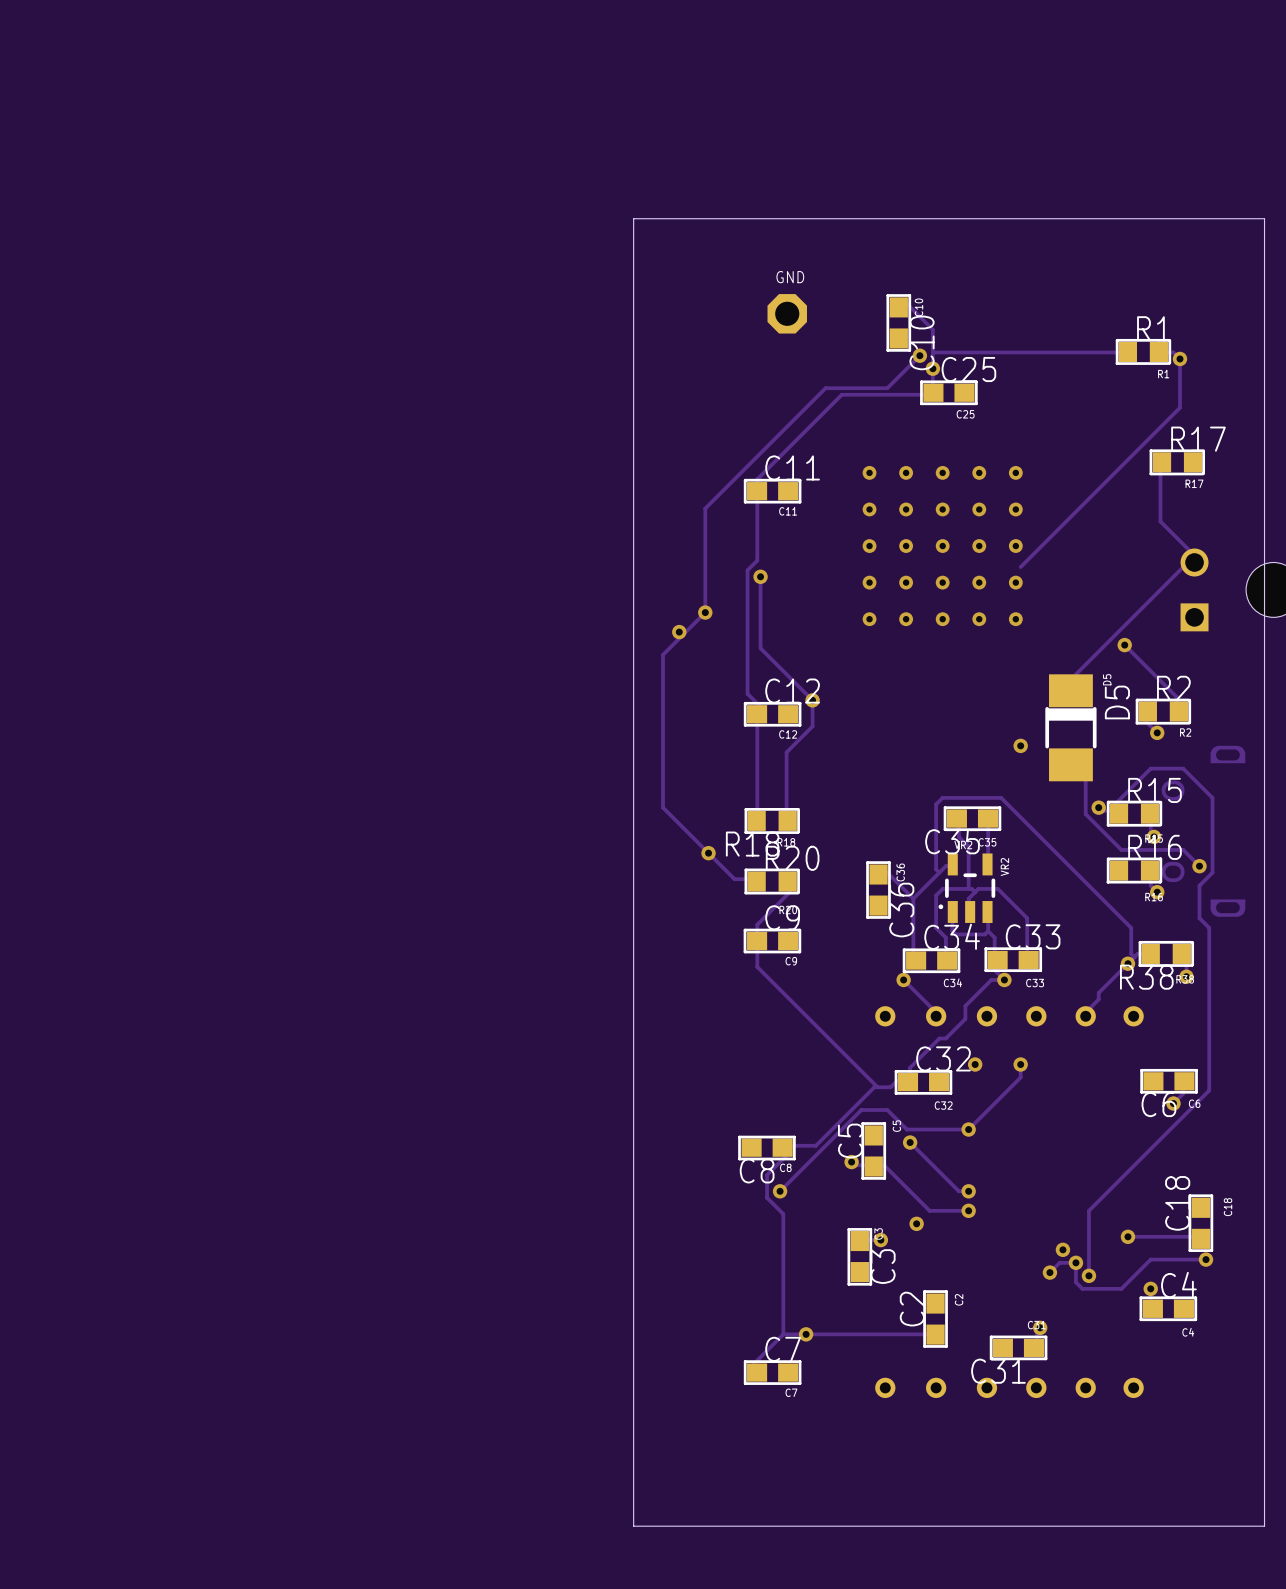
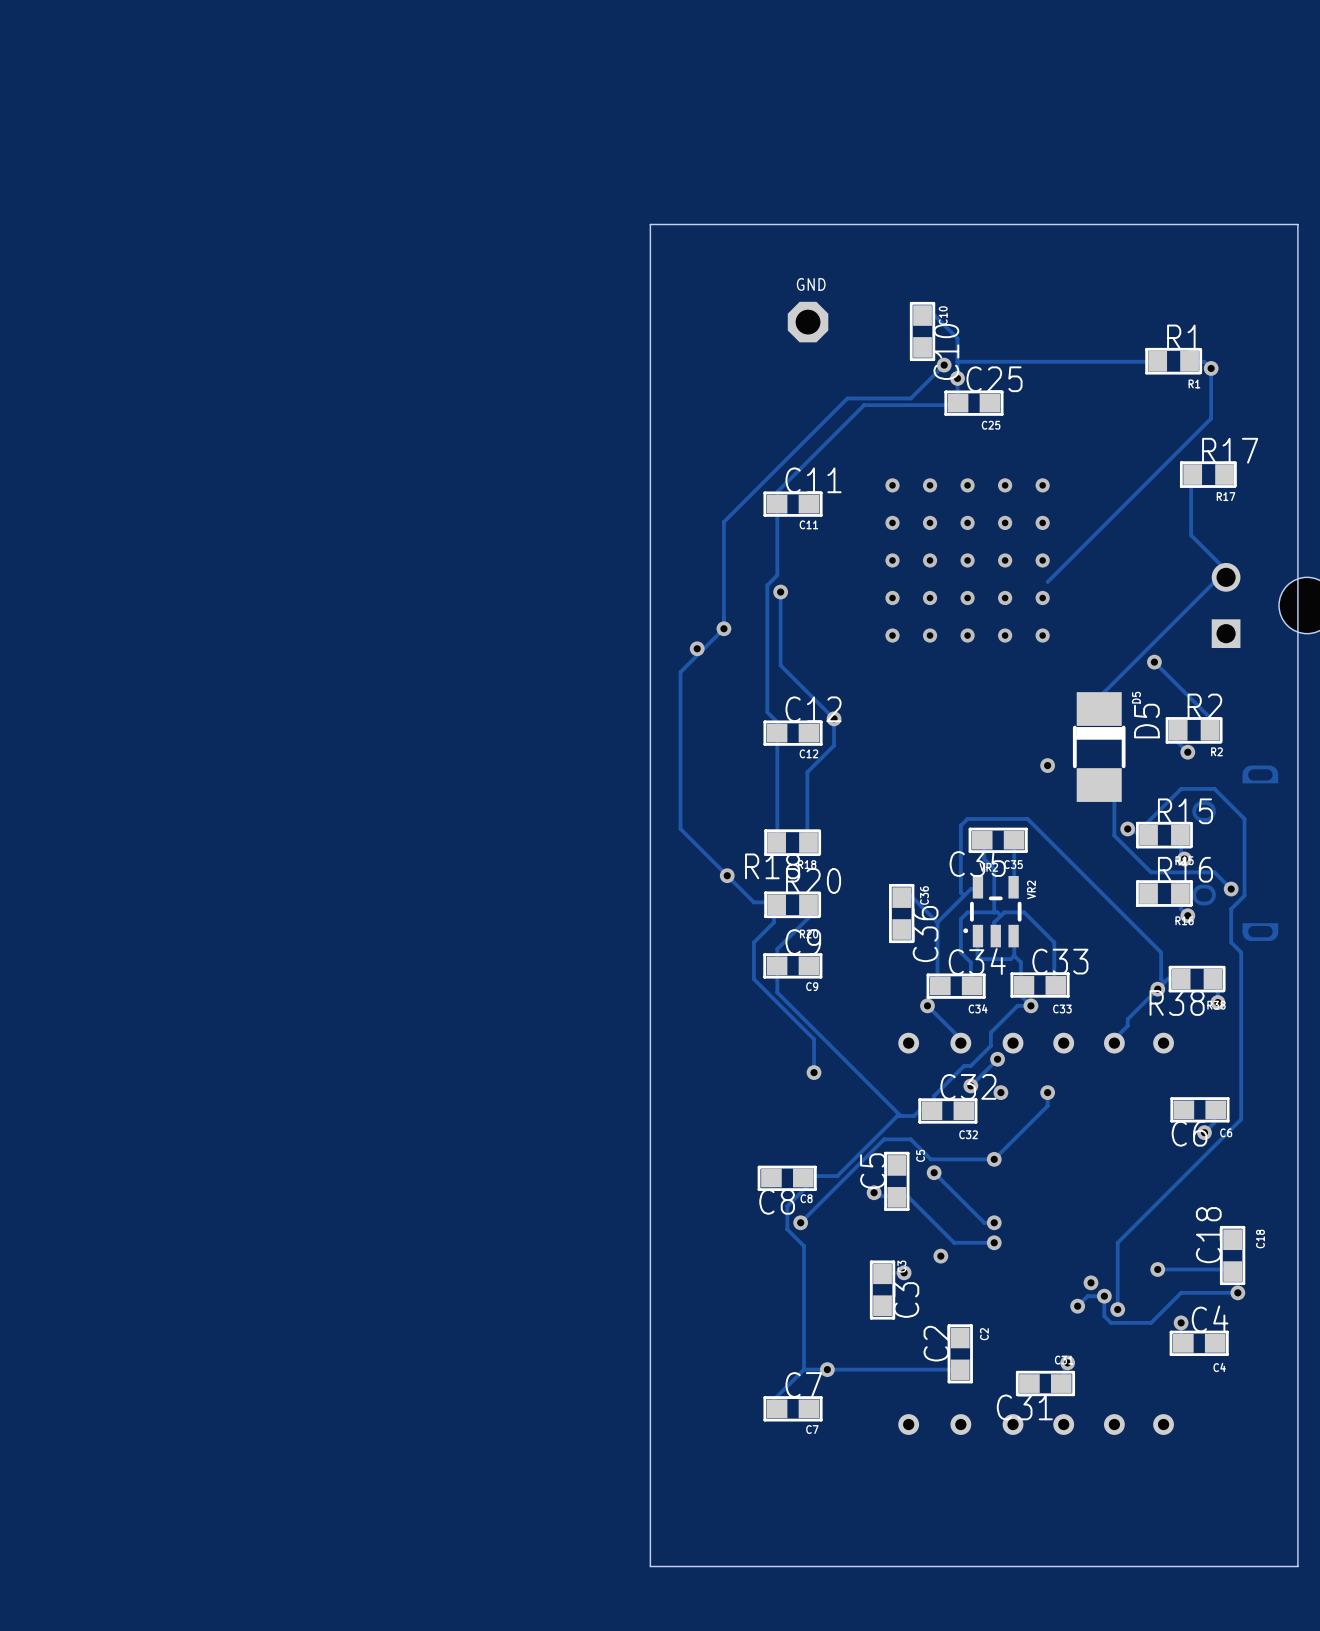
track: none -> (773, 905) (773, 922) (753, 942) (753, 979) (814, 1039) (814, 1072)
track: none -> (997, 1059) (970, 1085)
via: none -> (997, 1059)
via: none -> (814, 1072)
via: none -> (970, 1085)

